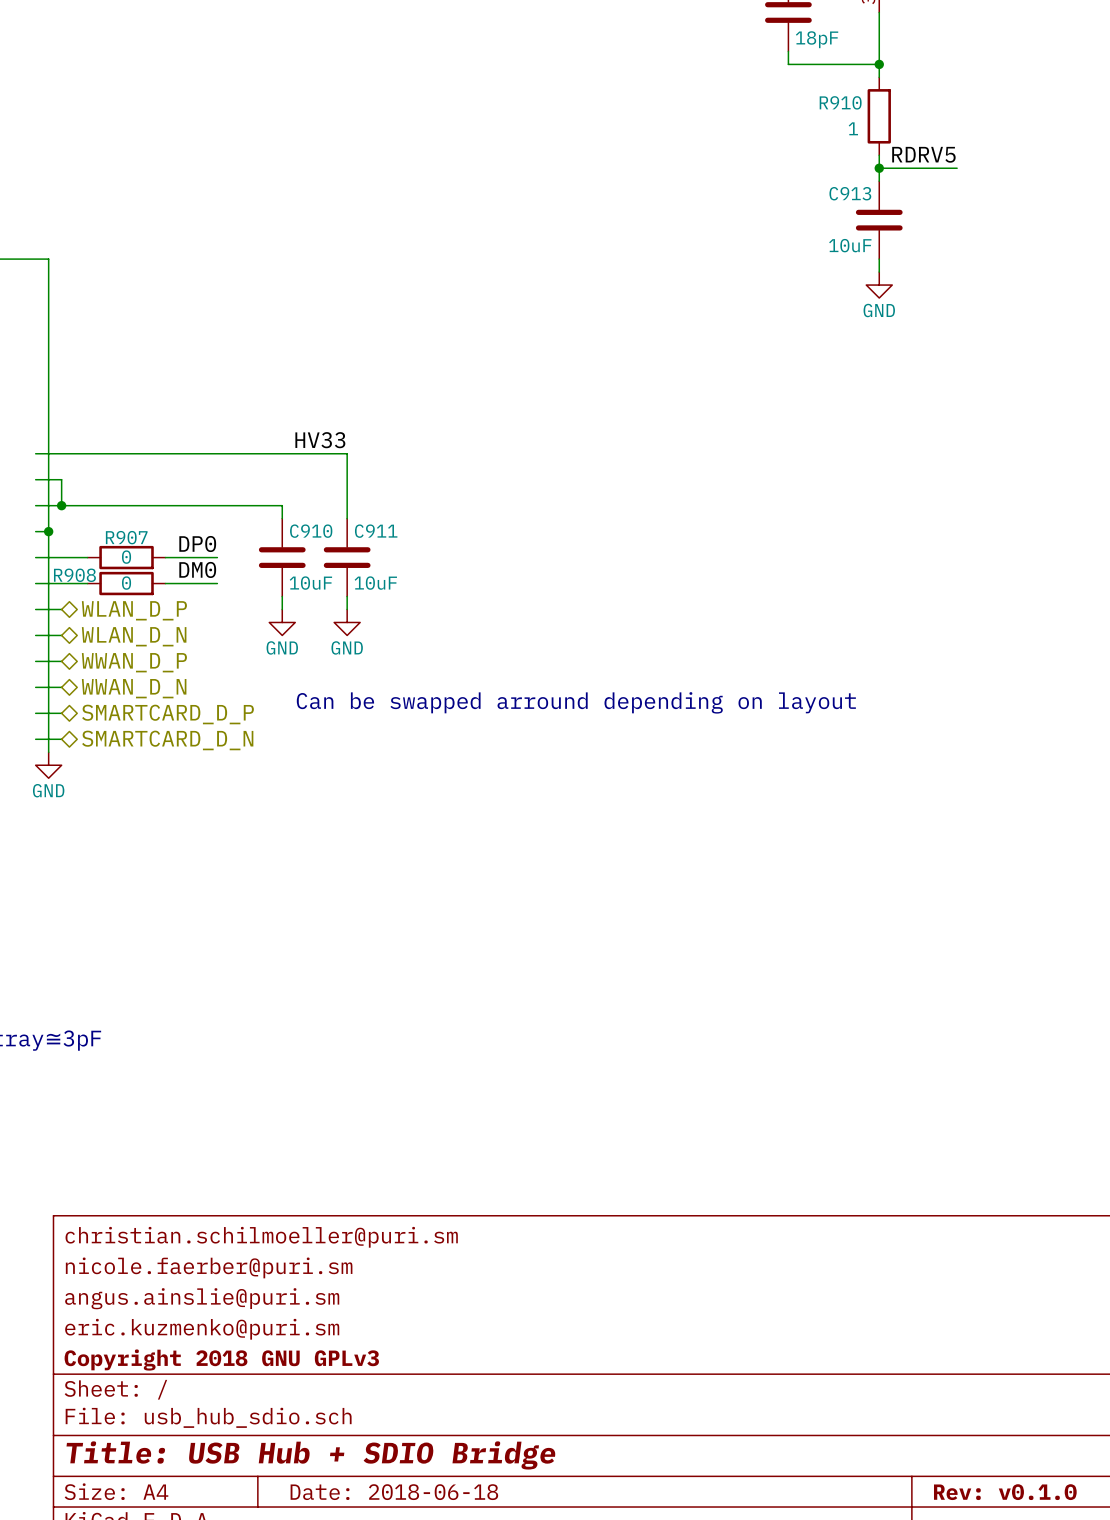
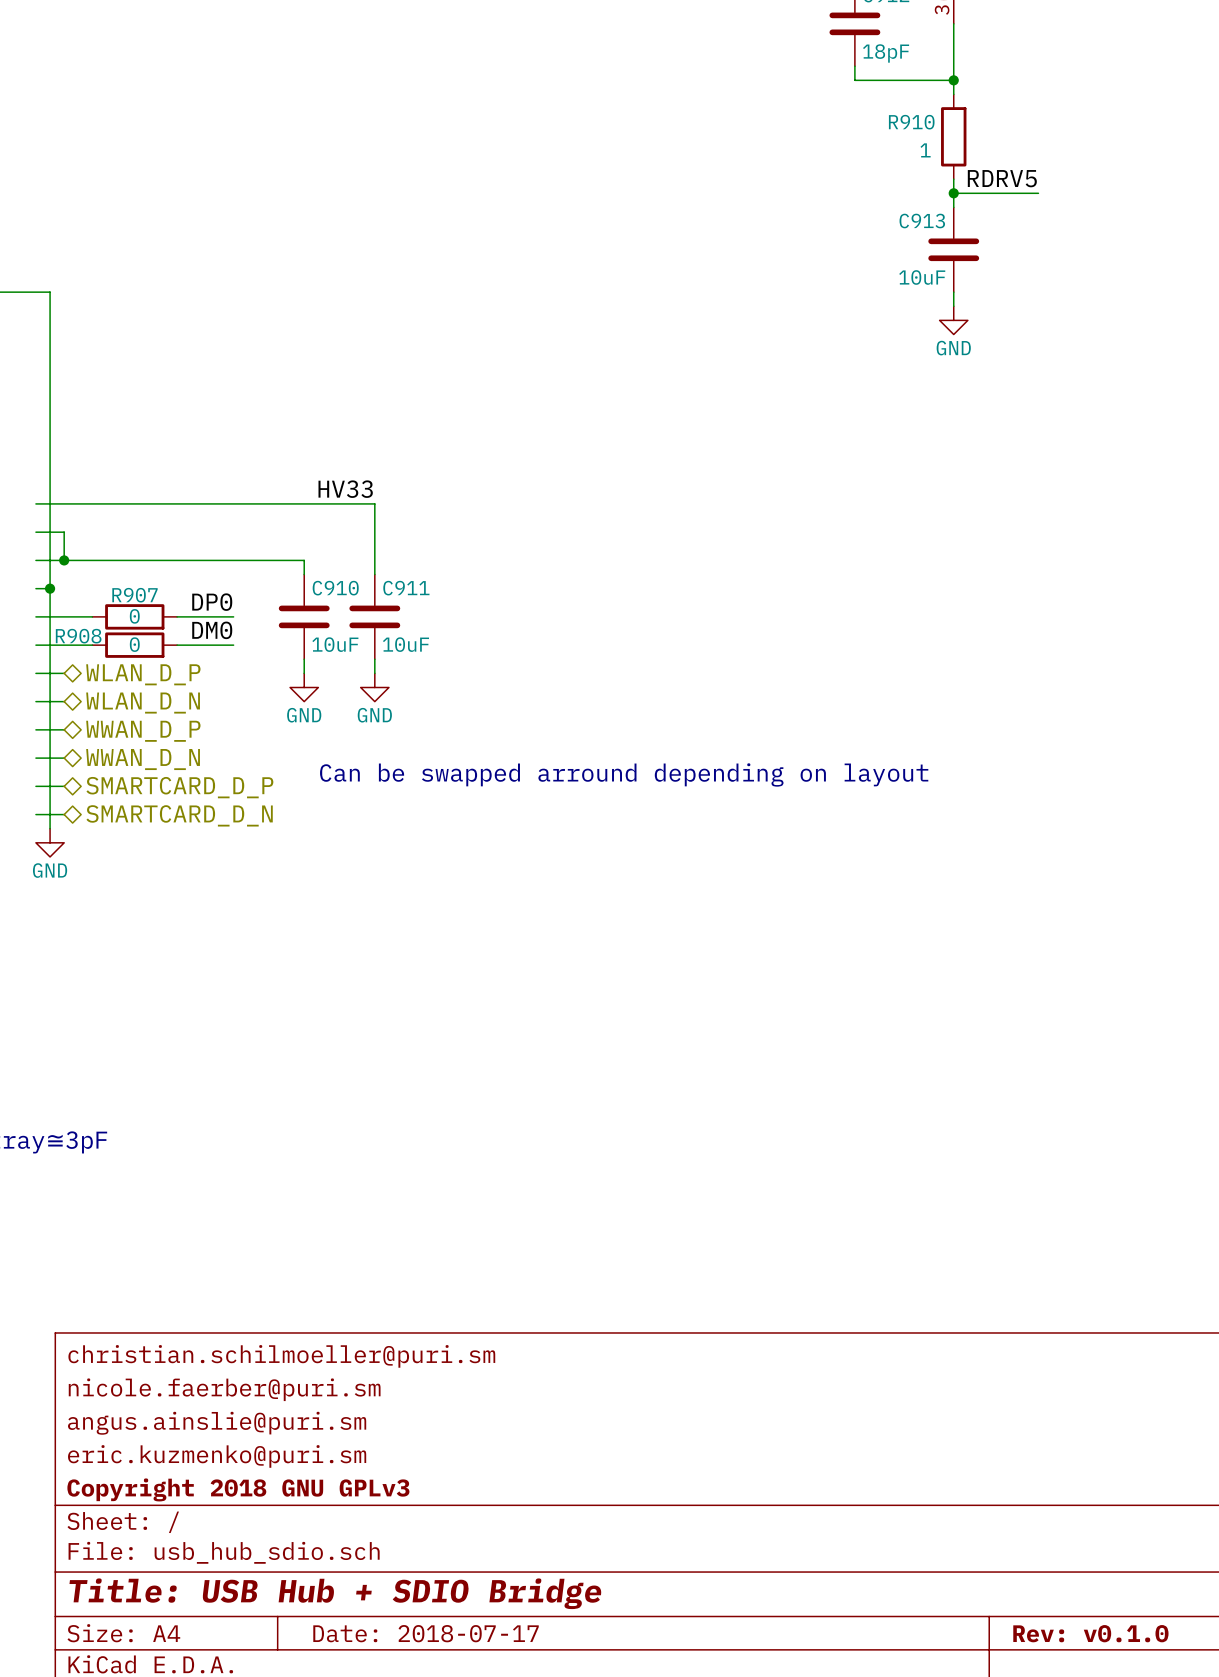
title block: Date: 2018-06-18 (394, 1492) -> Date: 2018-07-17 (426, 1633)

